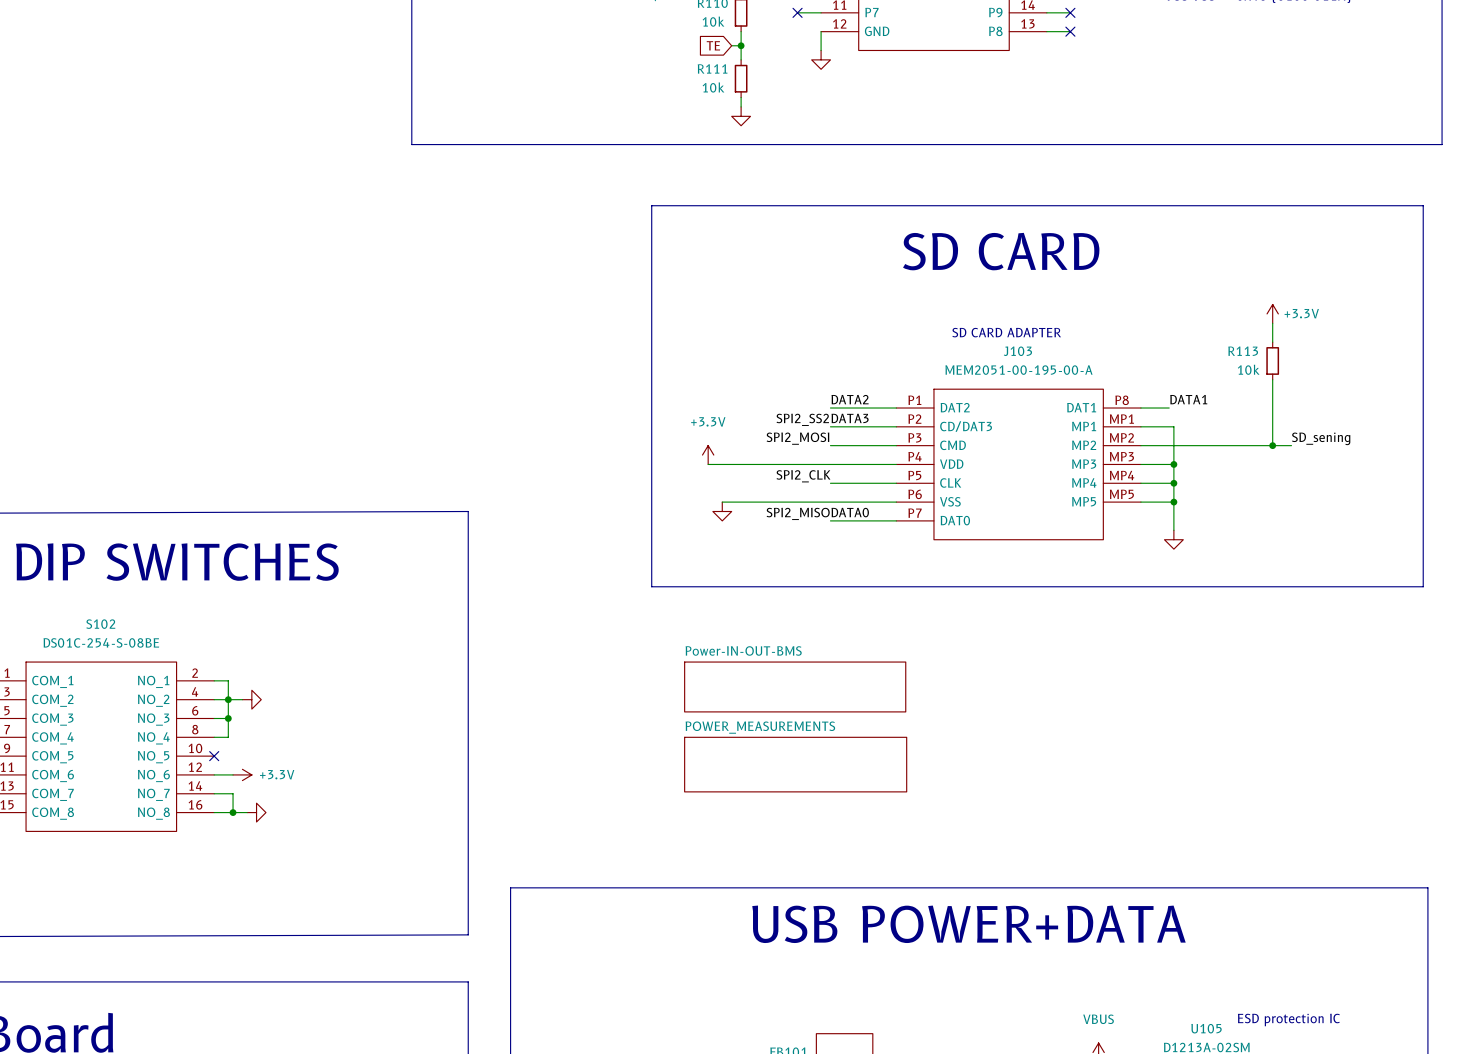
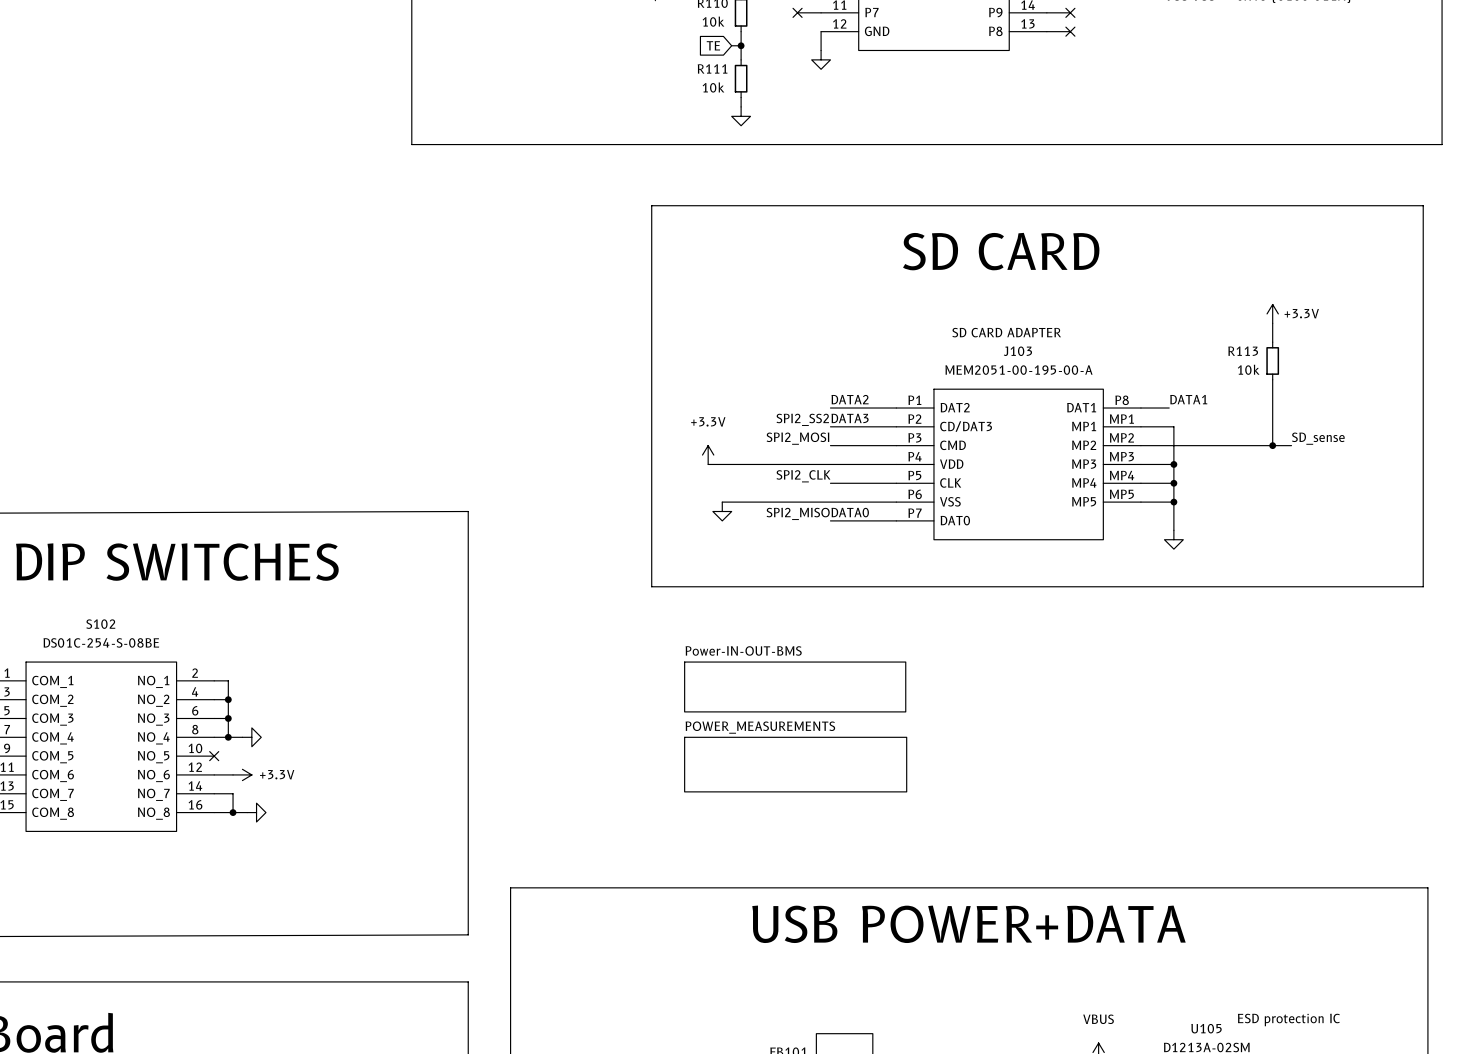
label: SD_sening (1321, 438) -> SD_sense (1318, 438)
wire: (228, 699) (242, 699) -> (228, 737) (242, 737)
power symbol position: (251, 699) -> (251, 737)
junction: none -> (228, 737)

